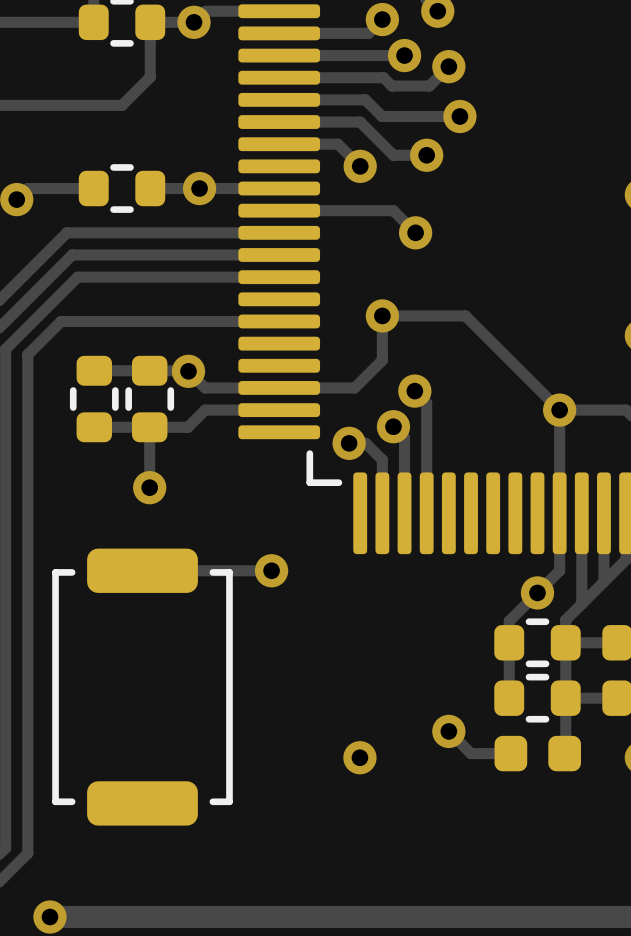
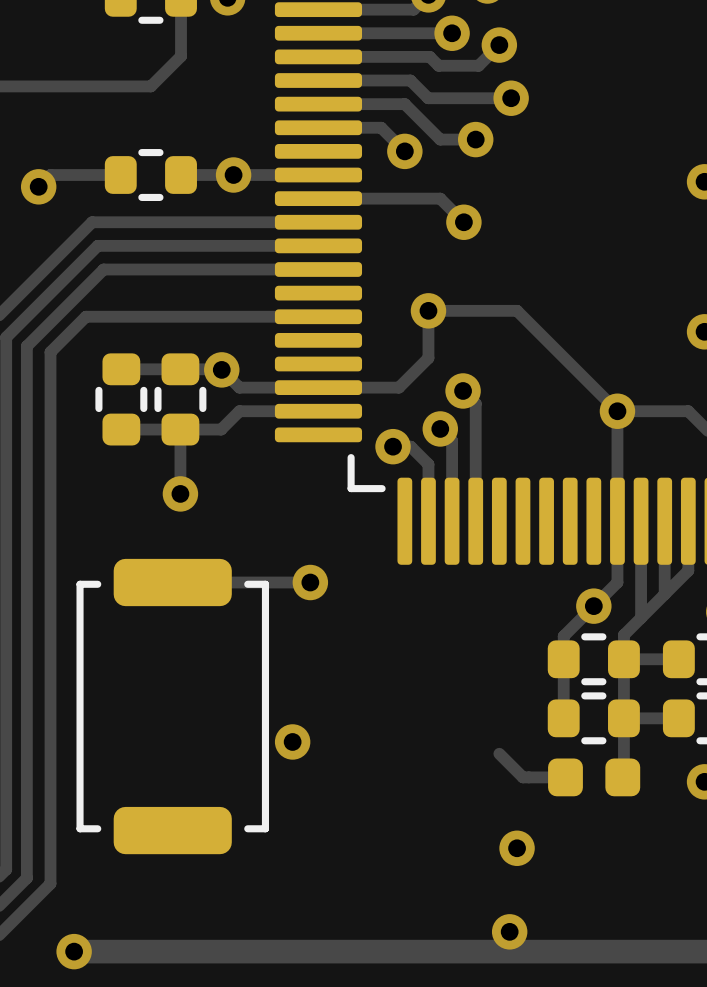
via: none -> (292, 741)
via: (448, 731) -> none
via: (359, 757) -> none
via: none -> (517, 848)
via: none -> (509, 931)

